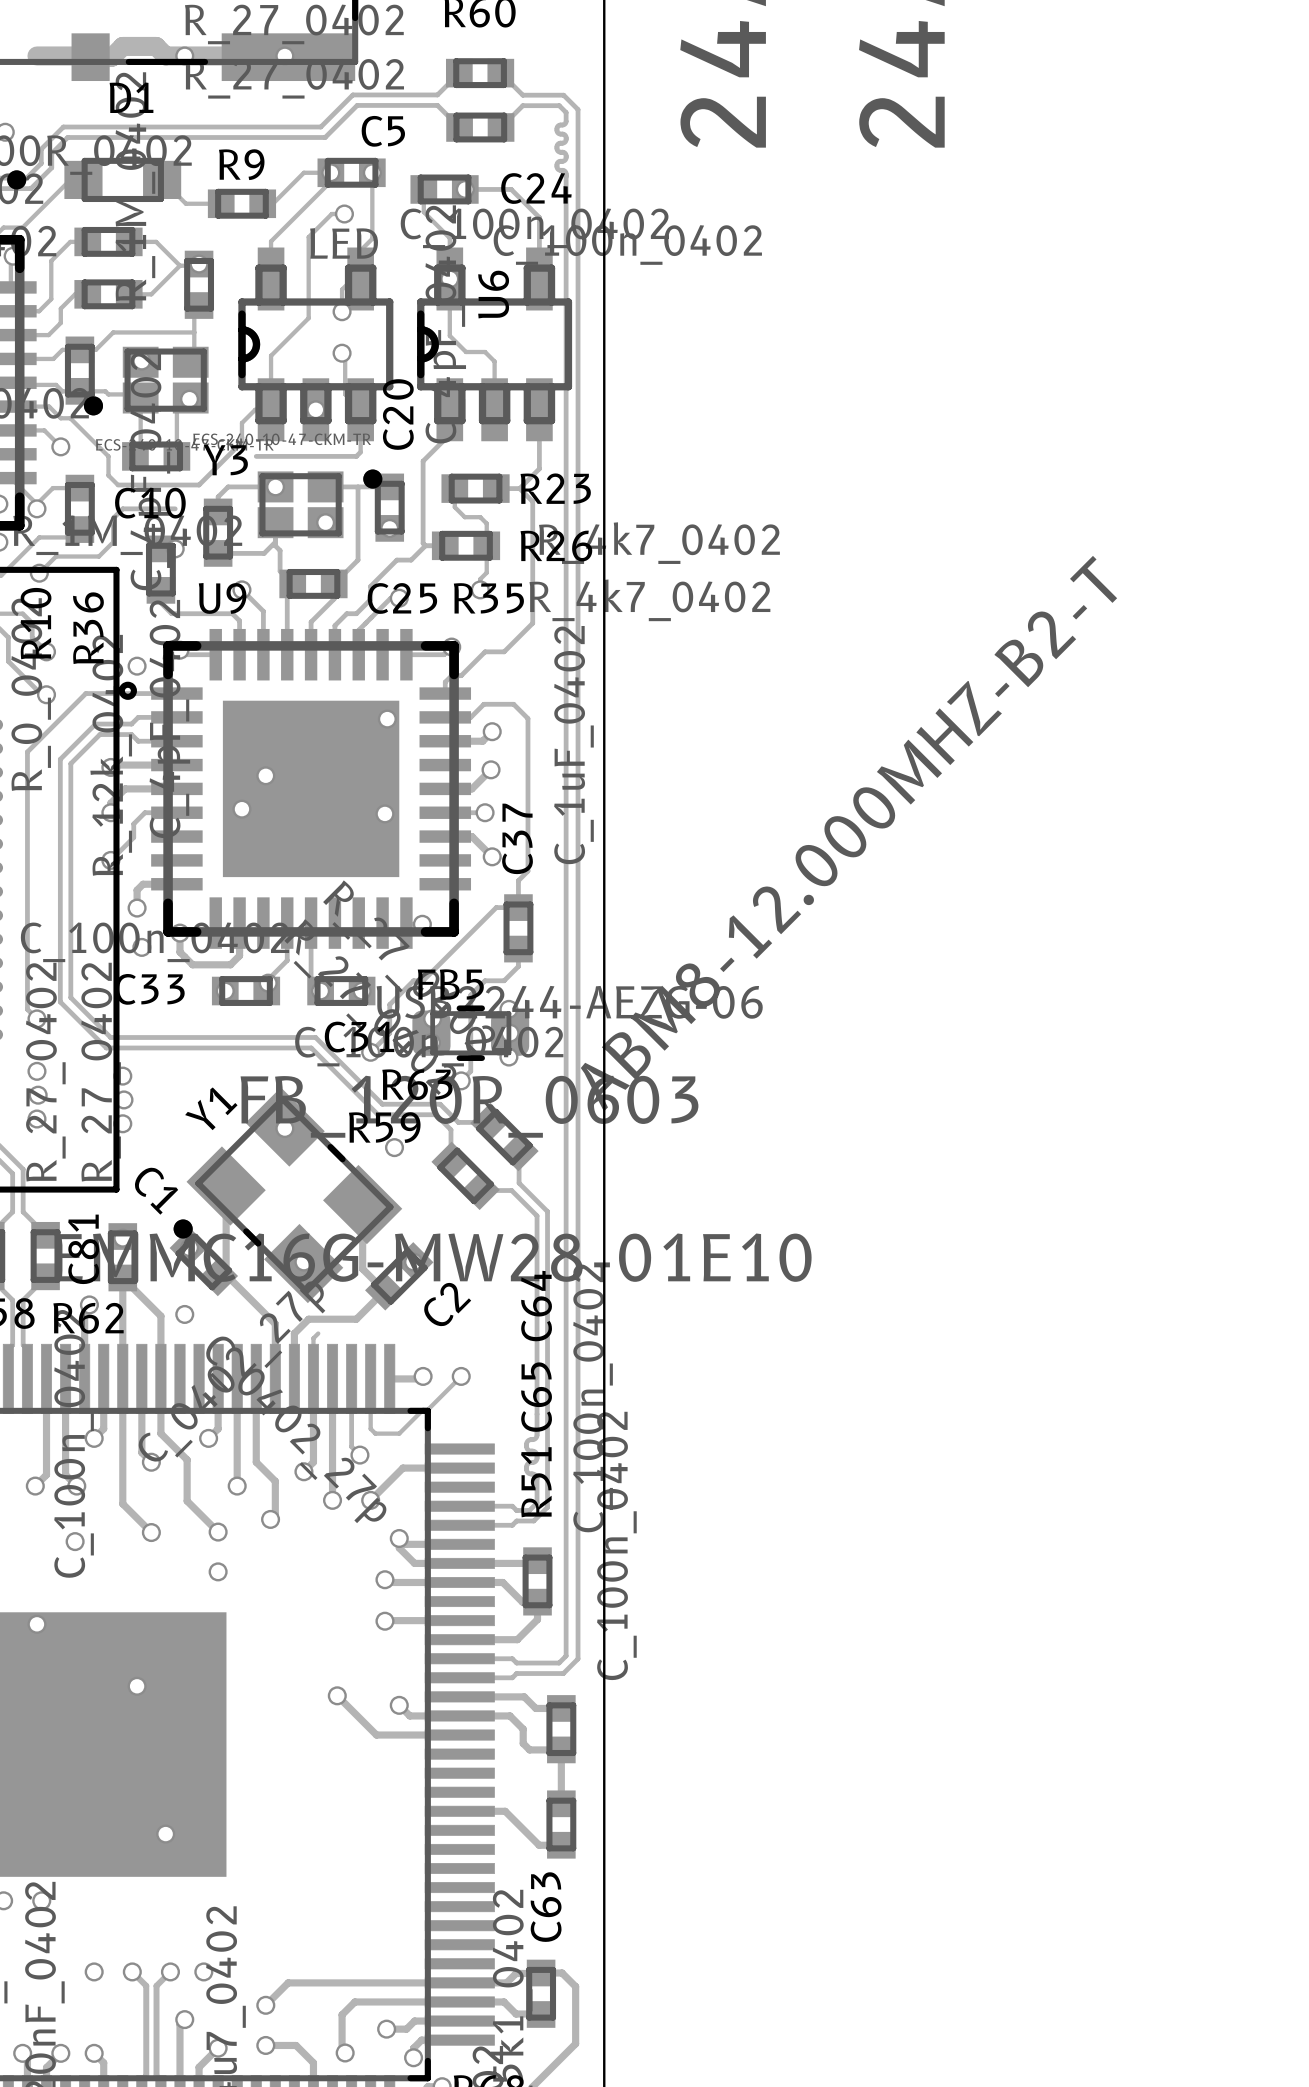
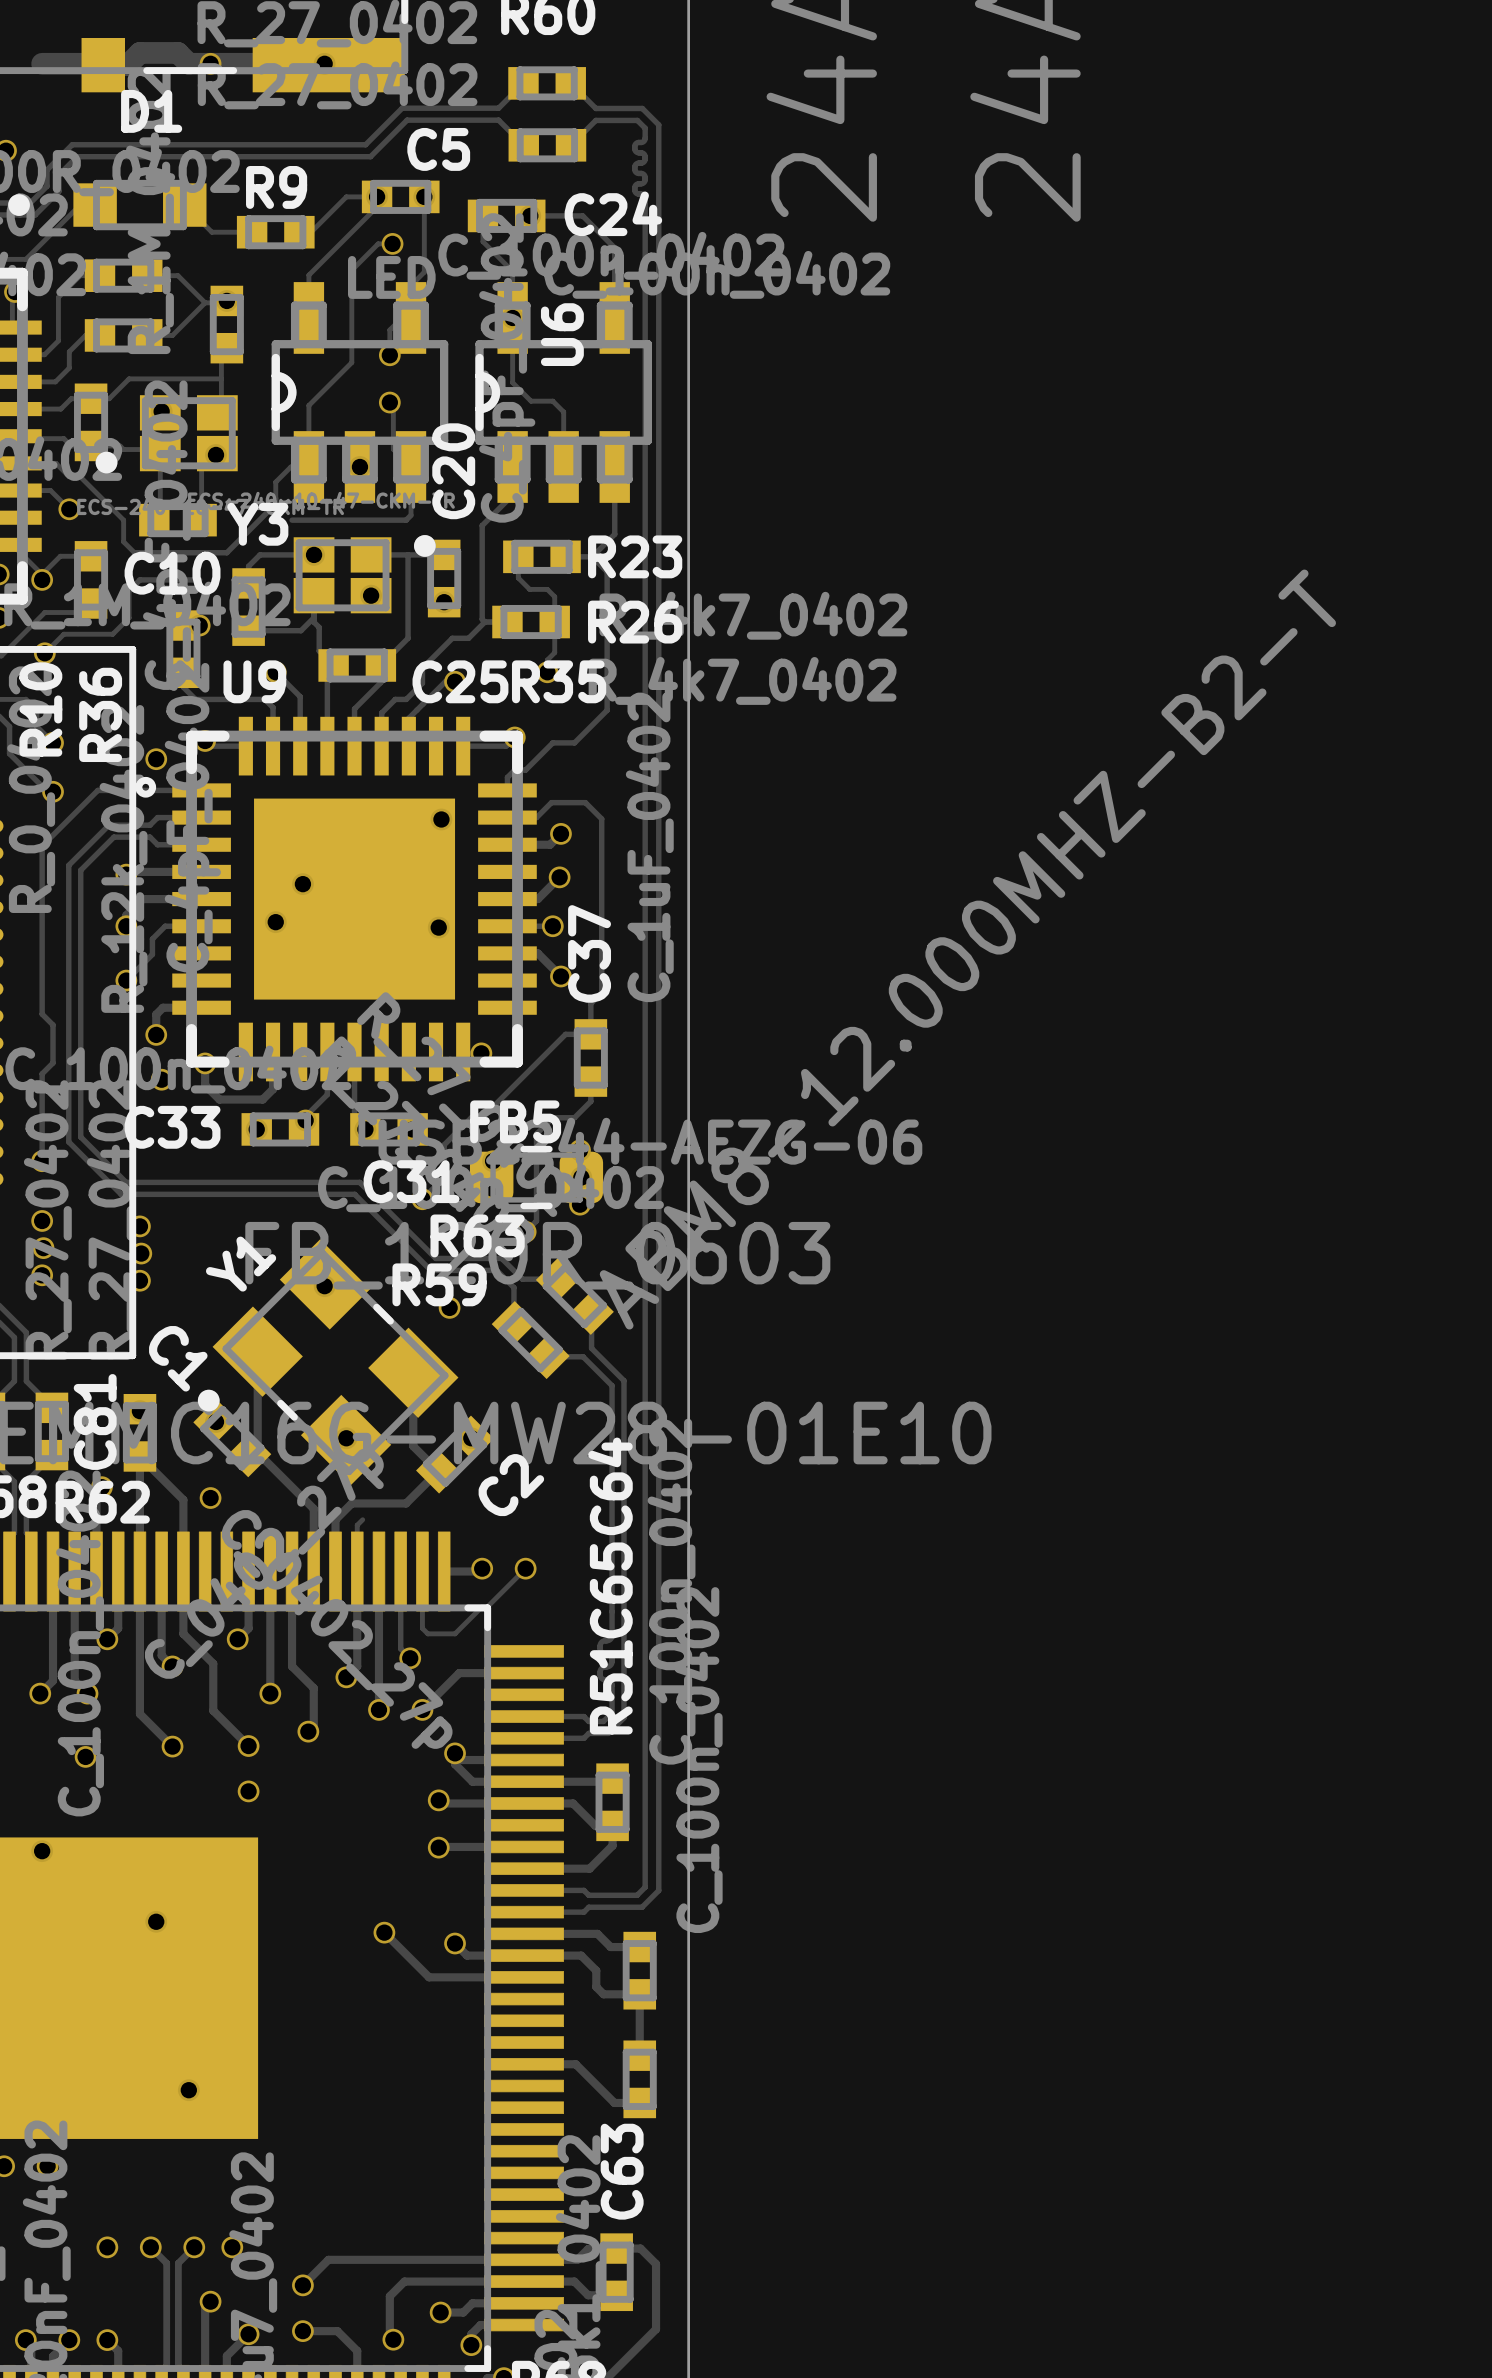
track: (36, 742) (27, 751) (27, 1009) (36, 1018) -> (42, 846) (42, 1014) (53, 1024) (53, 1063) (42, 1073) (42, 1161)

